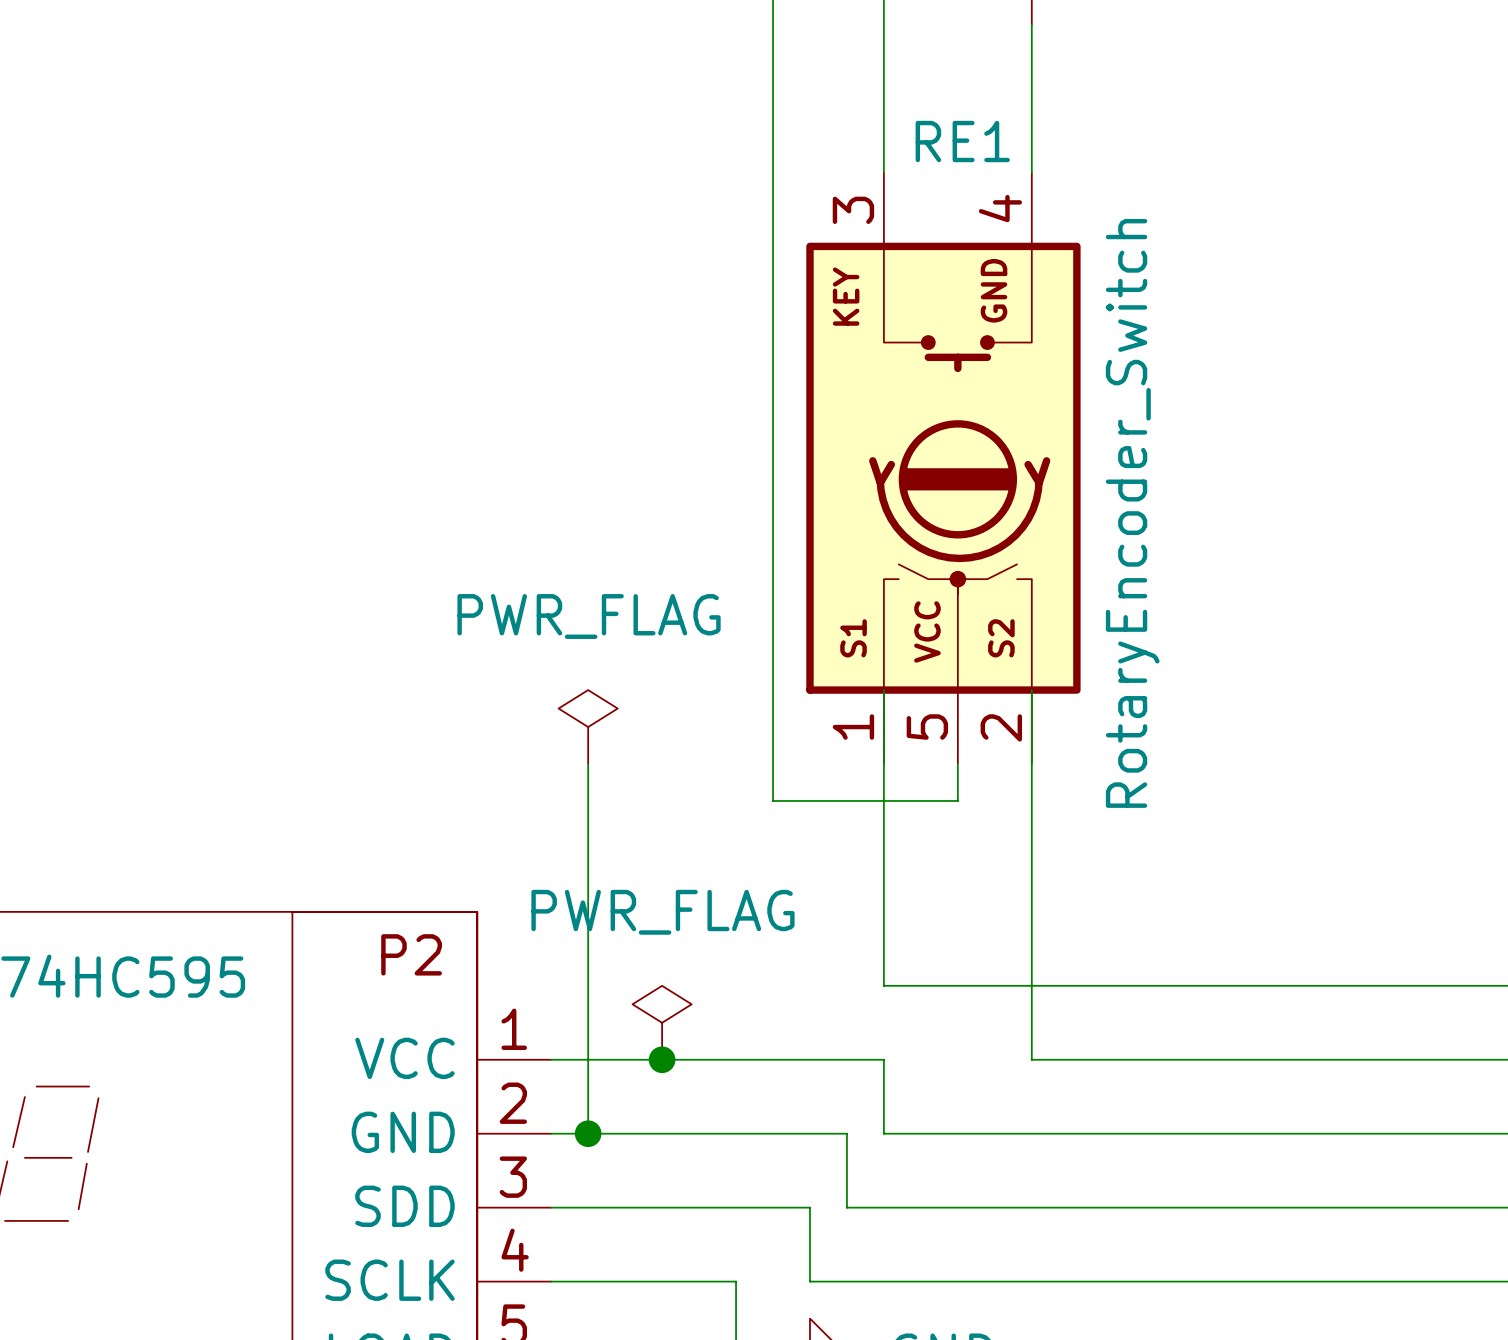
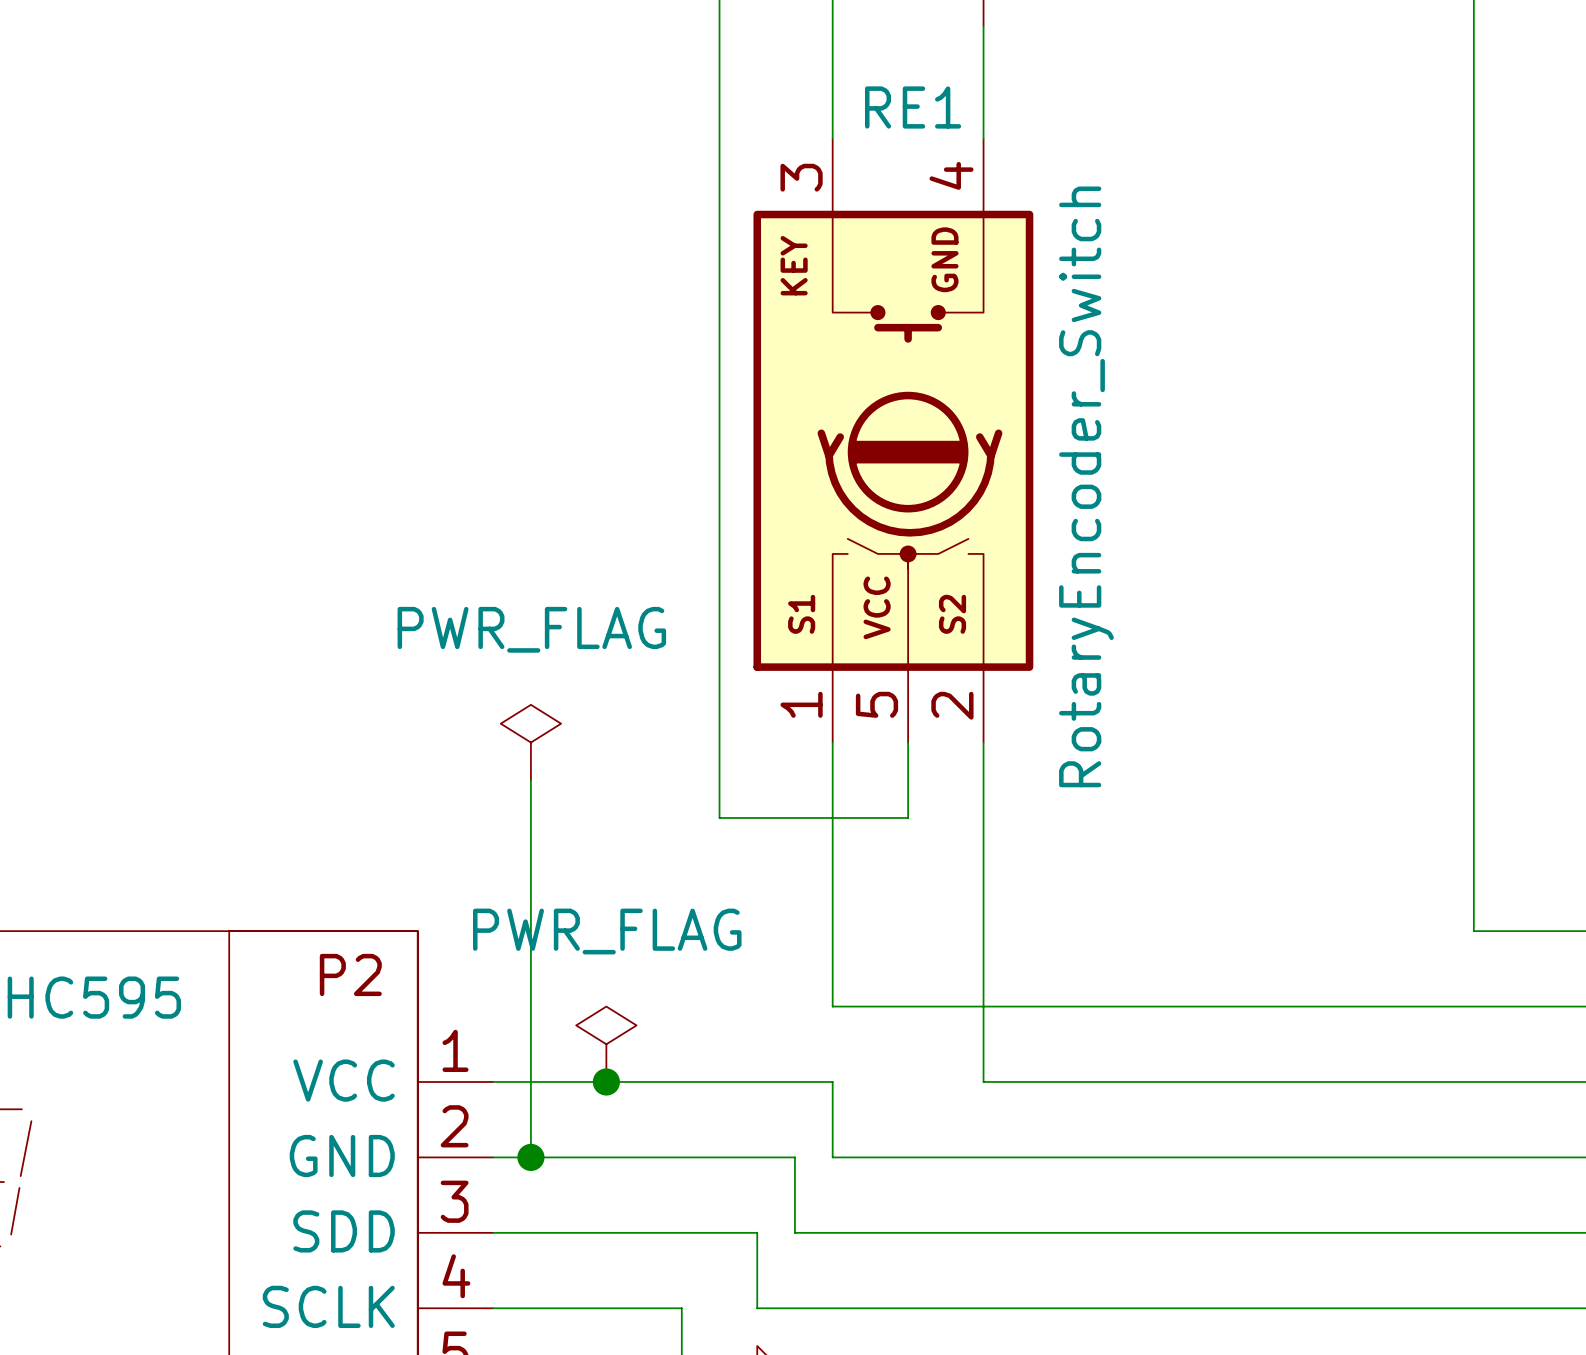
RE1 position: (943, 468) -> (893, 440)

